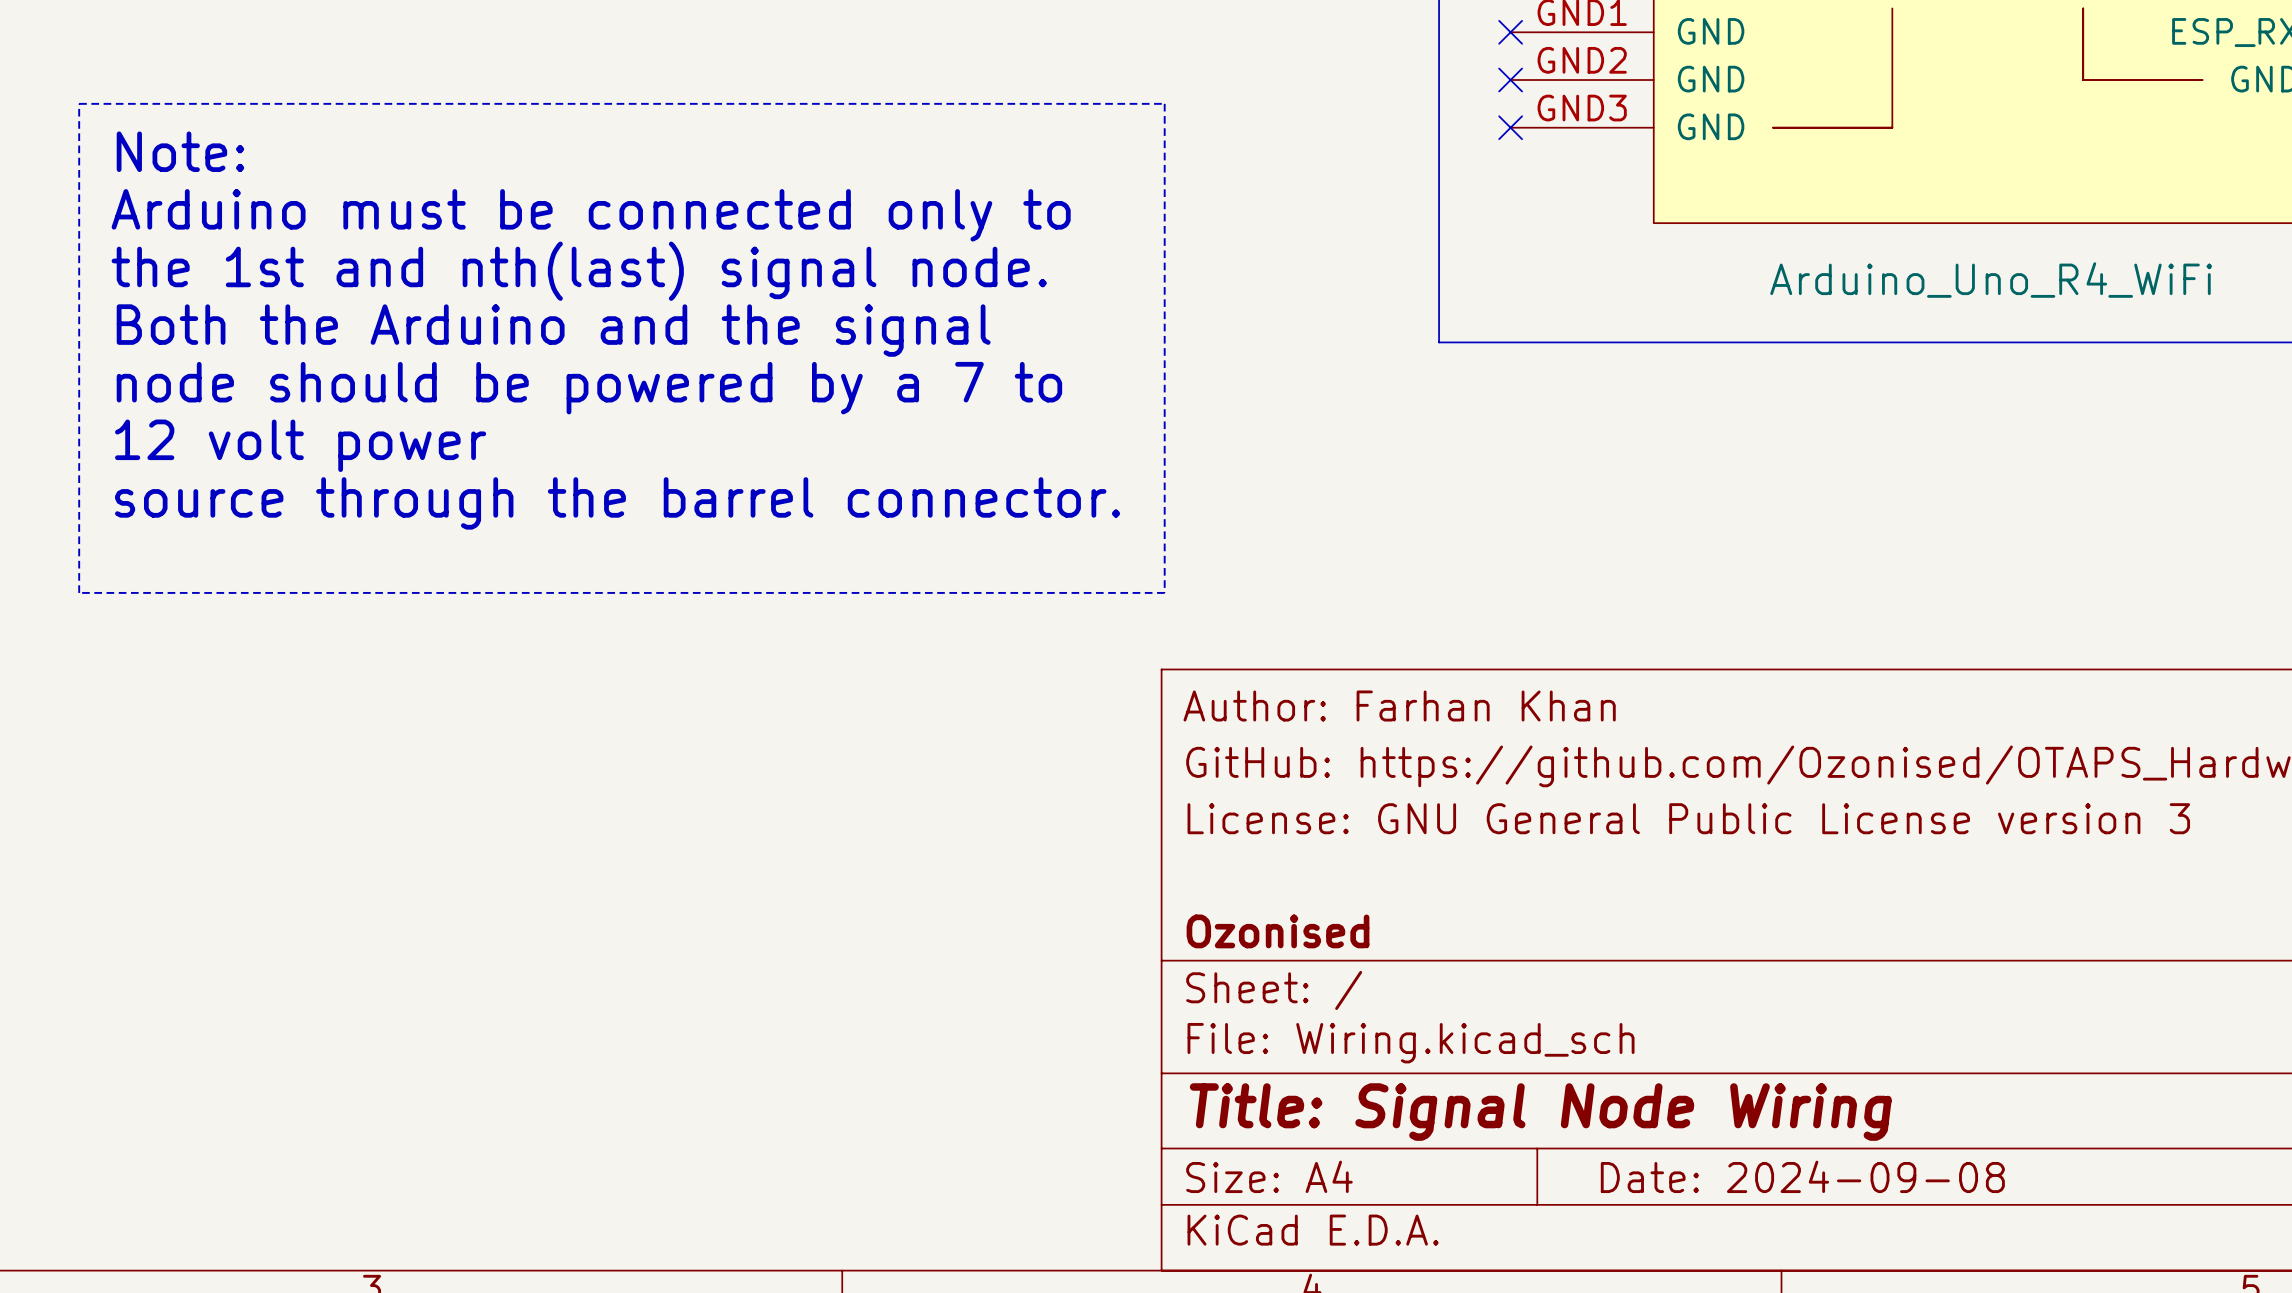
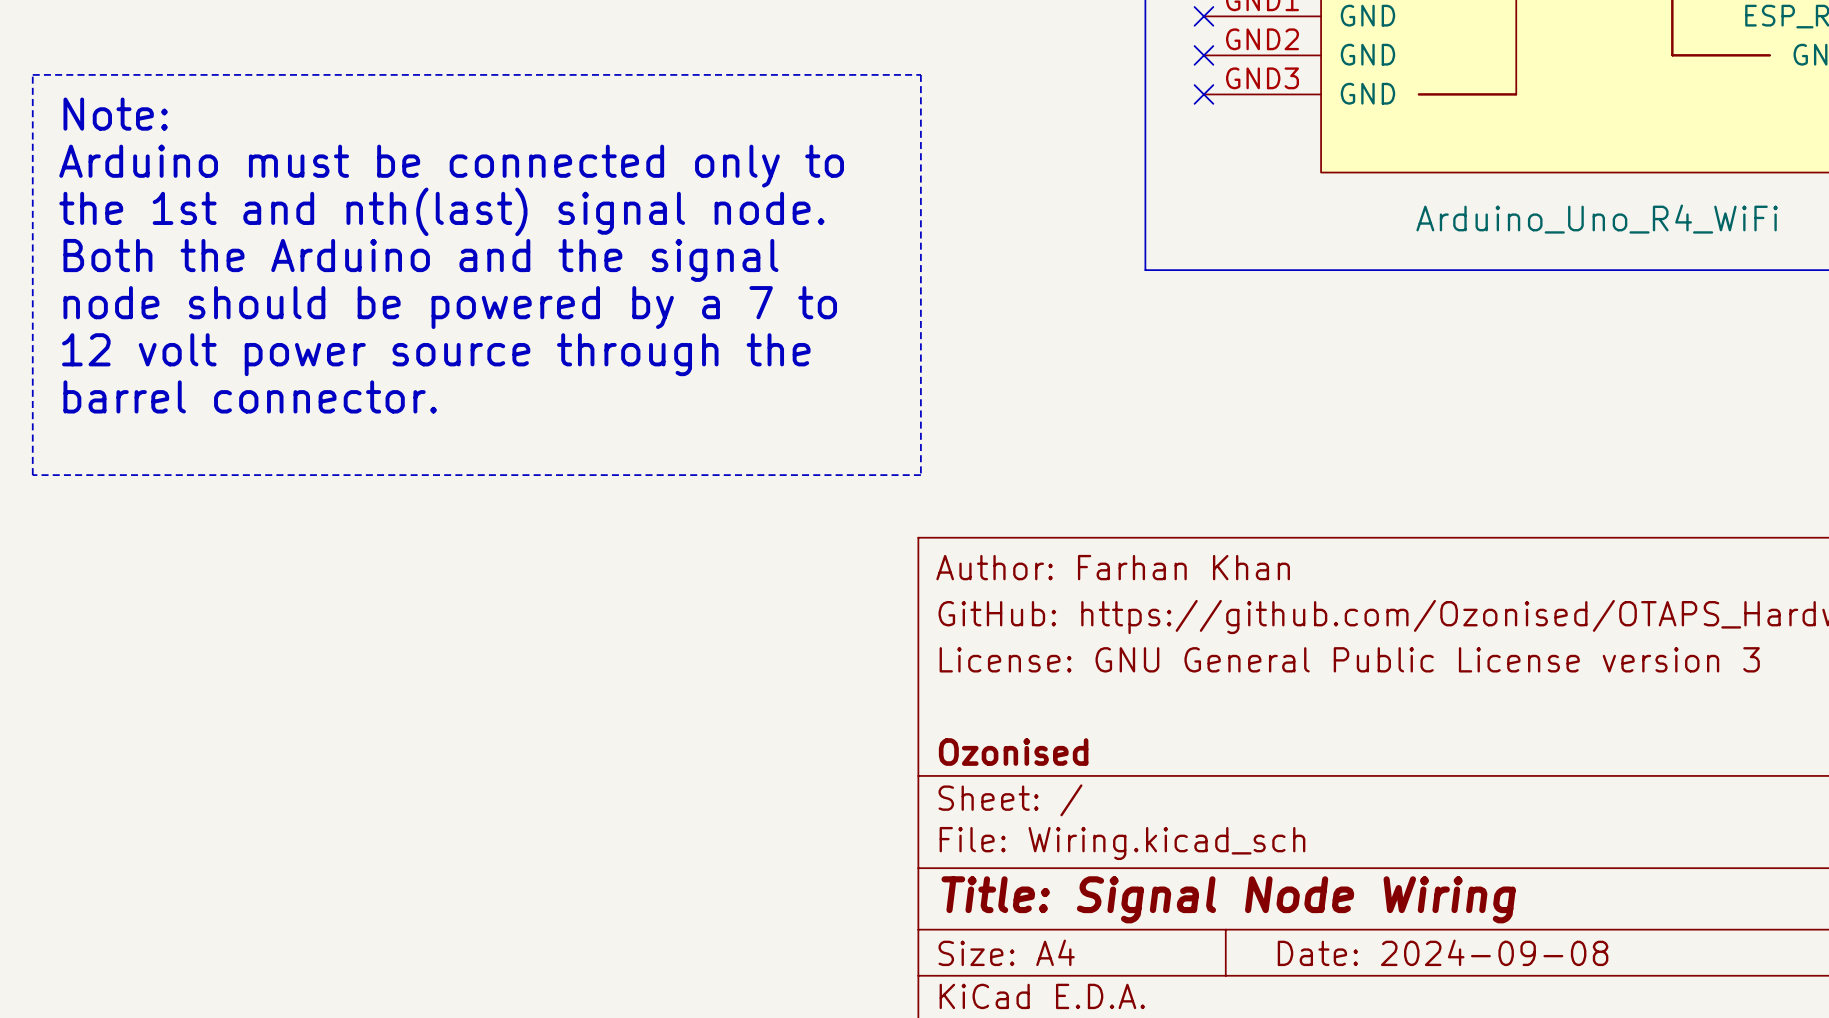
text: 12 volt power (300, 445) -> 12 volt power source through the (436, 354)
text: source through the barrel connector. (617, 503) -> barrel connector. (250, 396)

